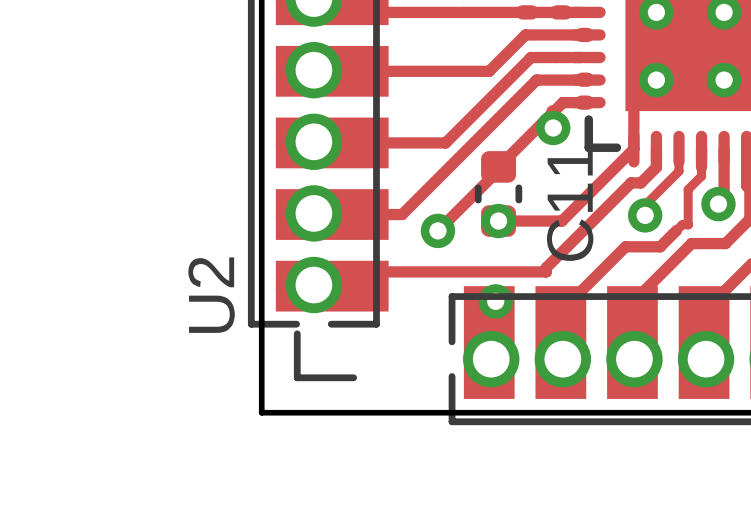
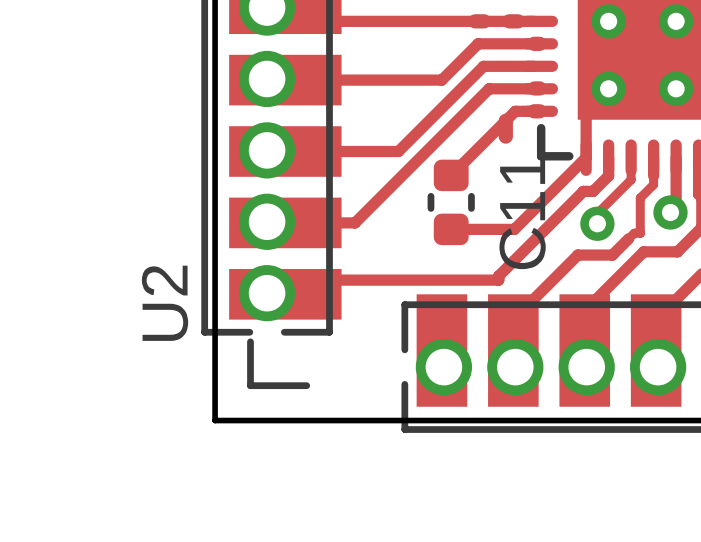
via: (553, 127) -> none
track: (498, 166) (498, 170) (437, 230) -> none
via: (498, 221) -> none
via: (437, 230) -> none
via: (495, 301) -> none

